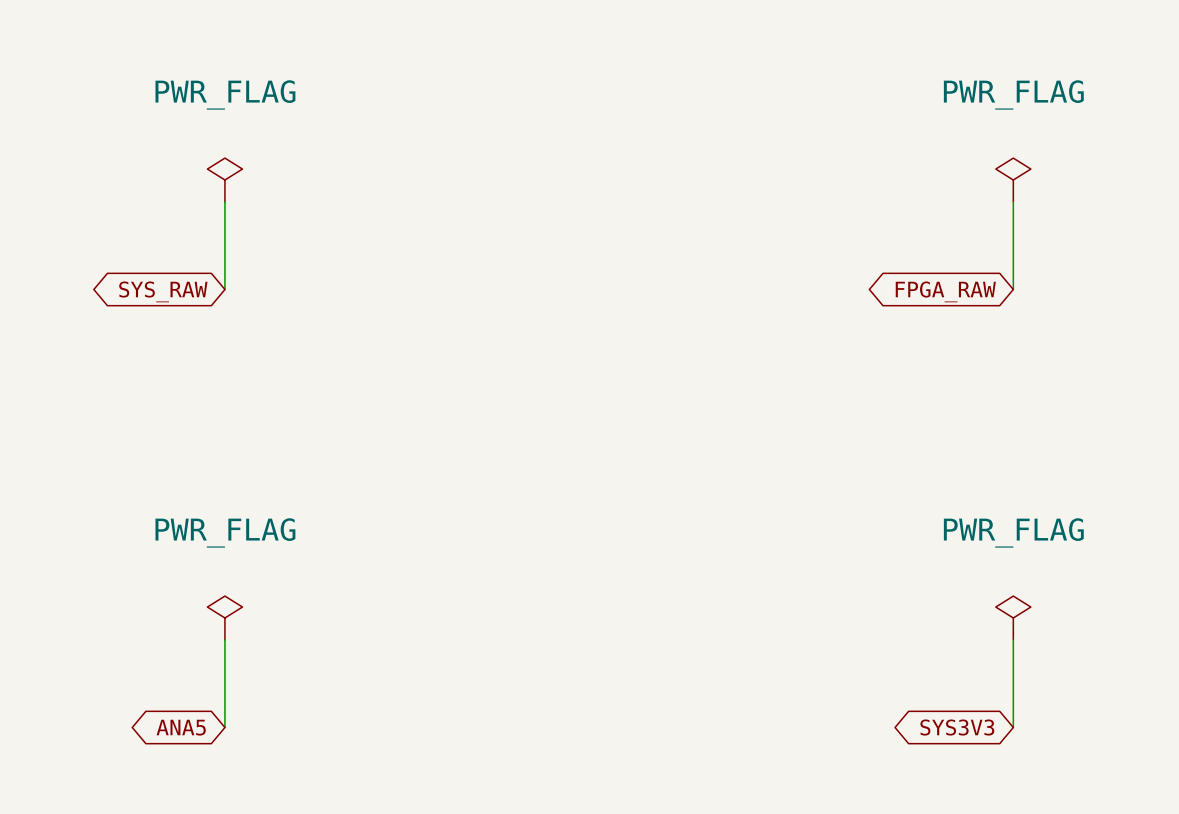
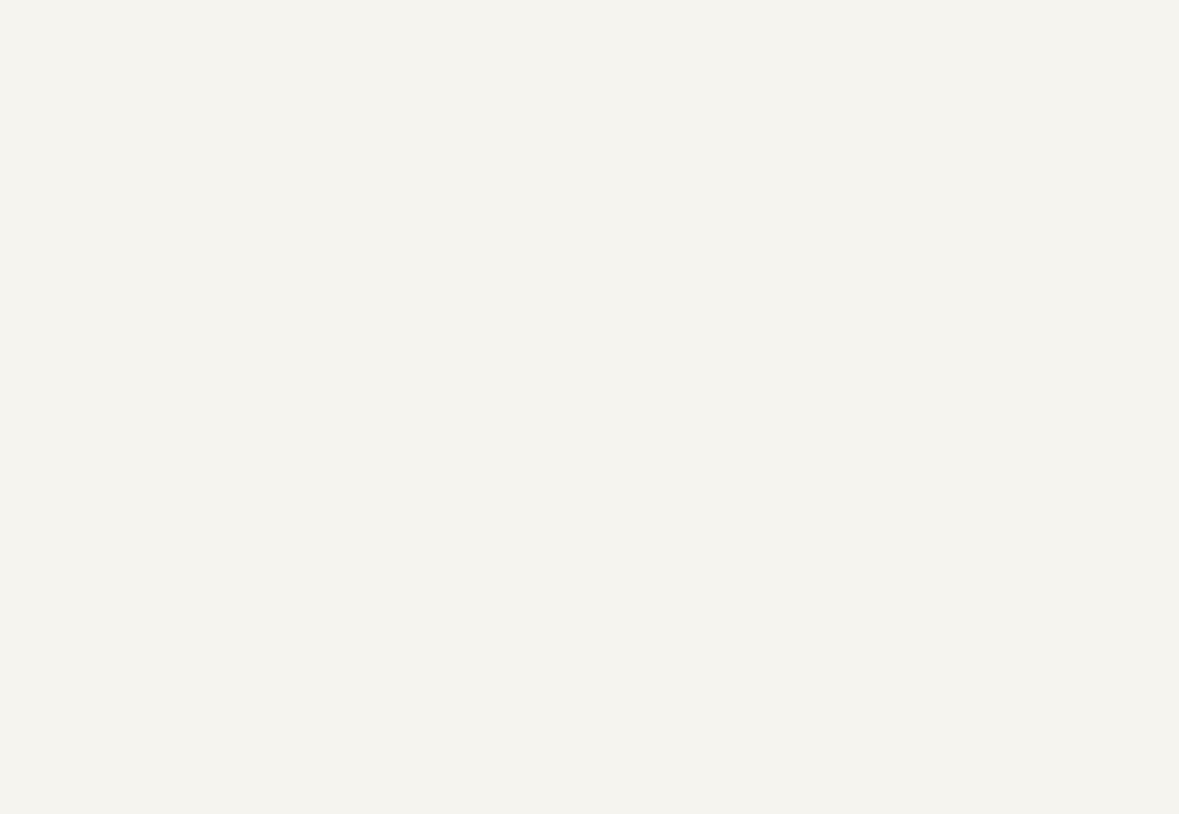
power symbol: PWR_FLAG (224, 180) -> none
power symbol: PWR_FLAG (1013, 180) -> none
wire: (224, 201) (224, 289) -> none
wire: (1013, 201) (1013, 289) -> none
global label: SYS_RAW (163, 291) -> none
global label: FPGA_RAW (945, 291) -> none
power symbol: PWR_FLAG (224, 618) -> none
power symbol: PWR_FLAG (1013, 618) -> none
wire: (224, 639) (224, 727) -> none
wire: (1013, 639) (1013, 727) -> none
global label: ANA5 (181, 727) -> none
global label: SYS3V3 (957, 727) -> none

